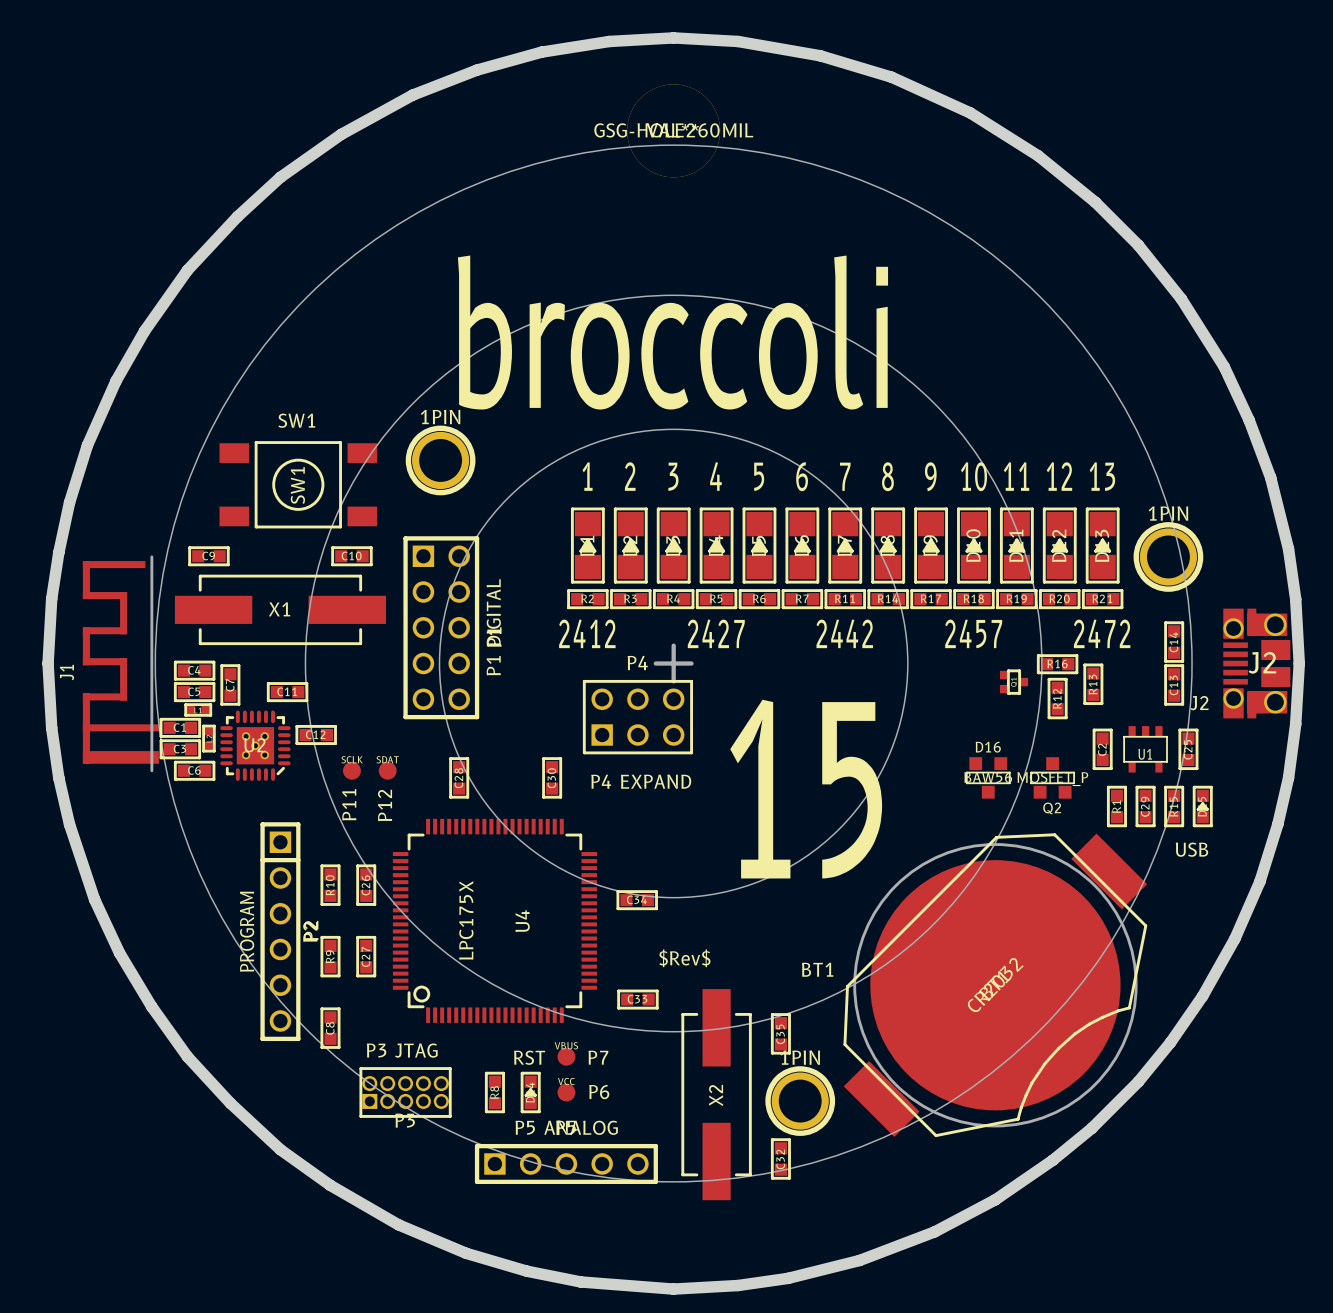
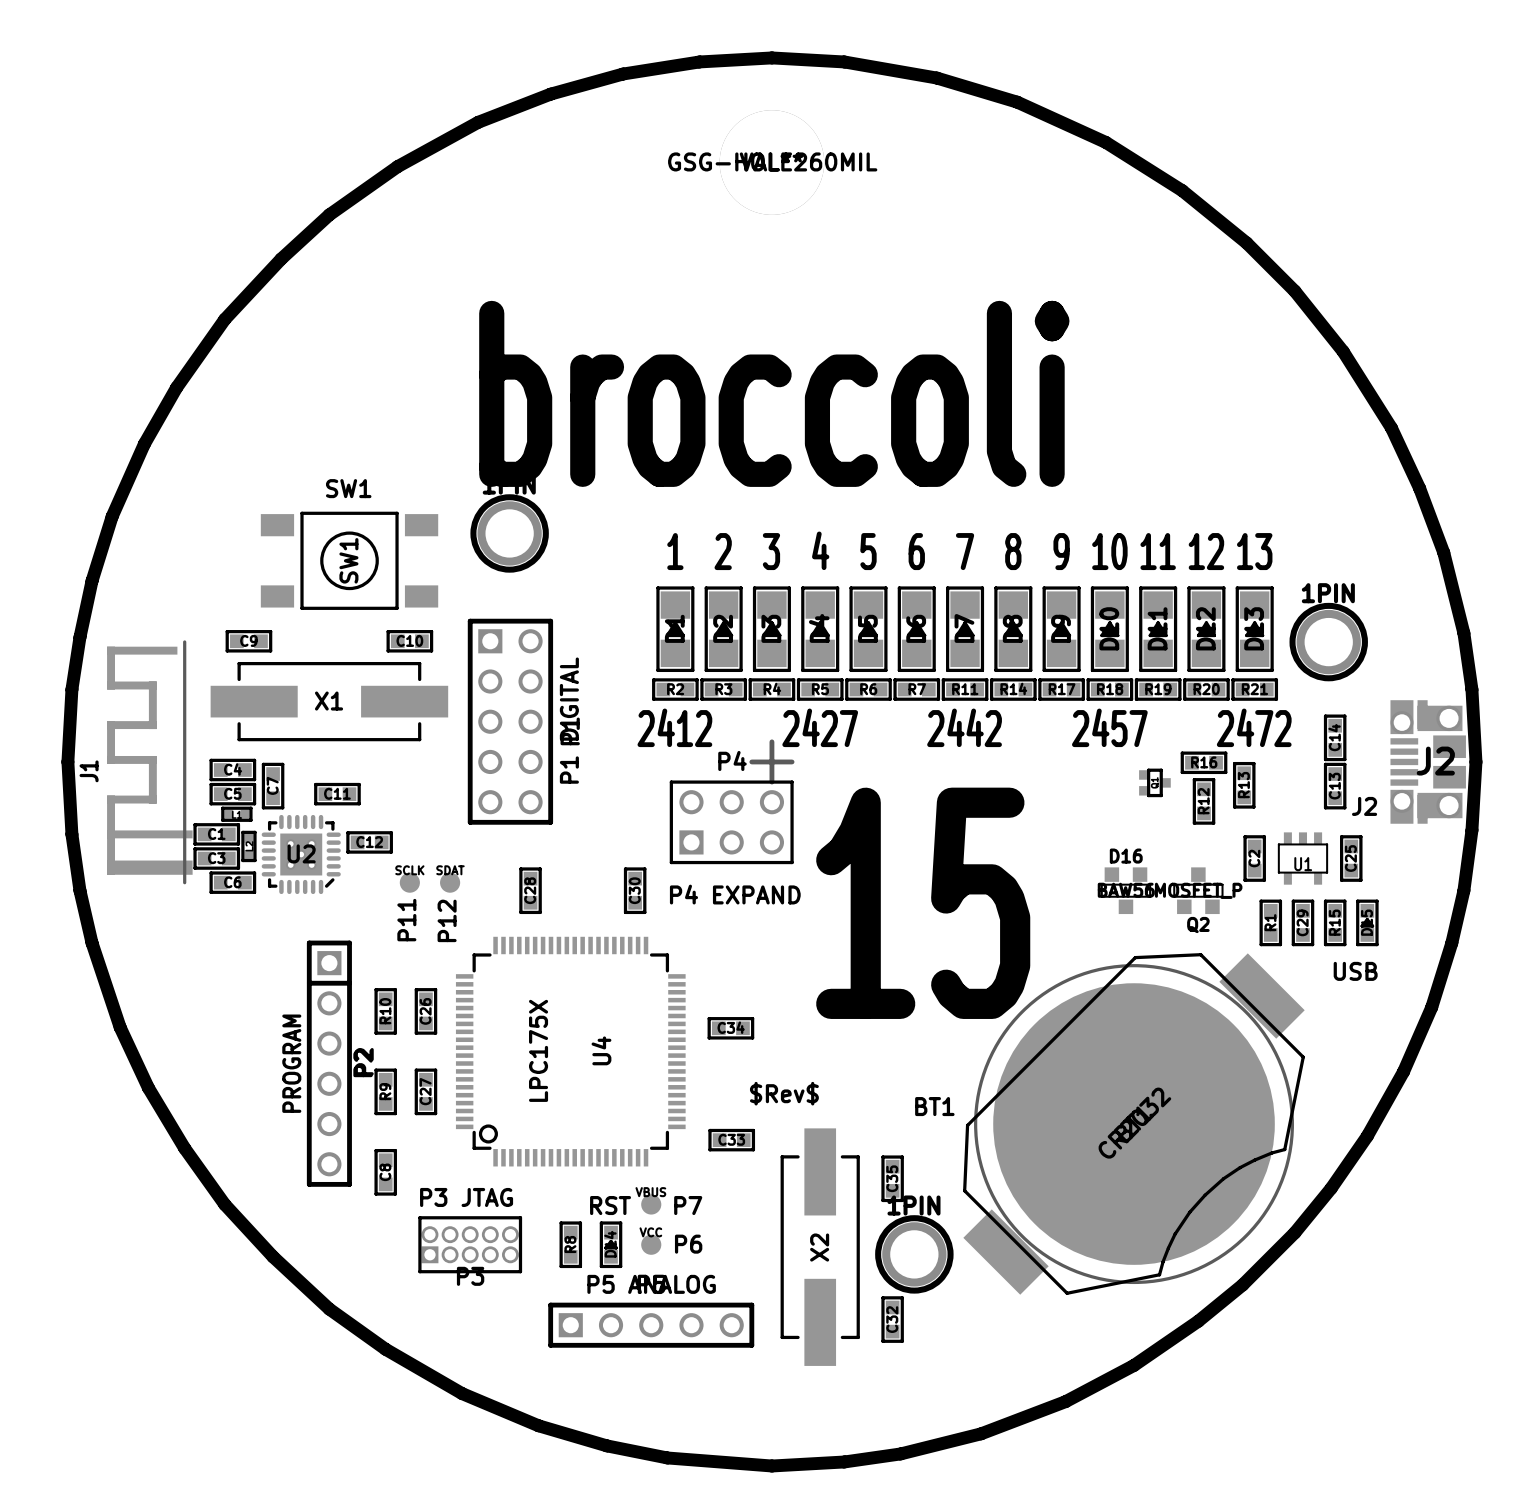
drawing: [154, 144, 1193, 1183] -> none

